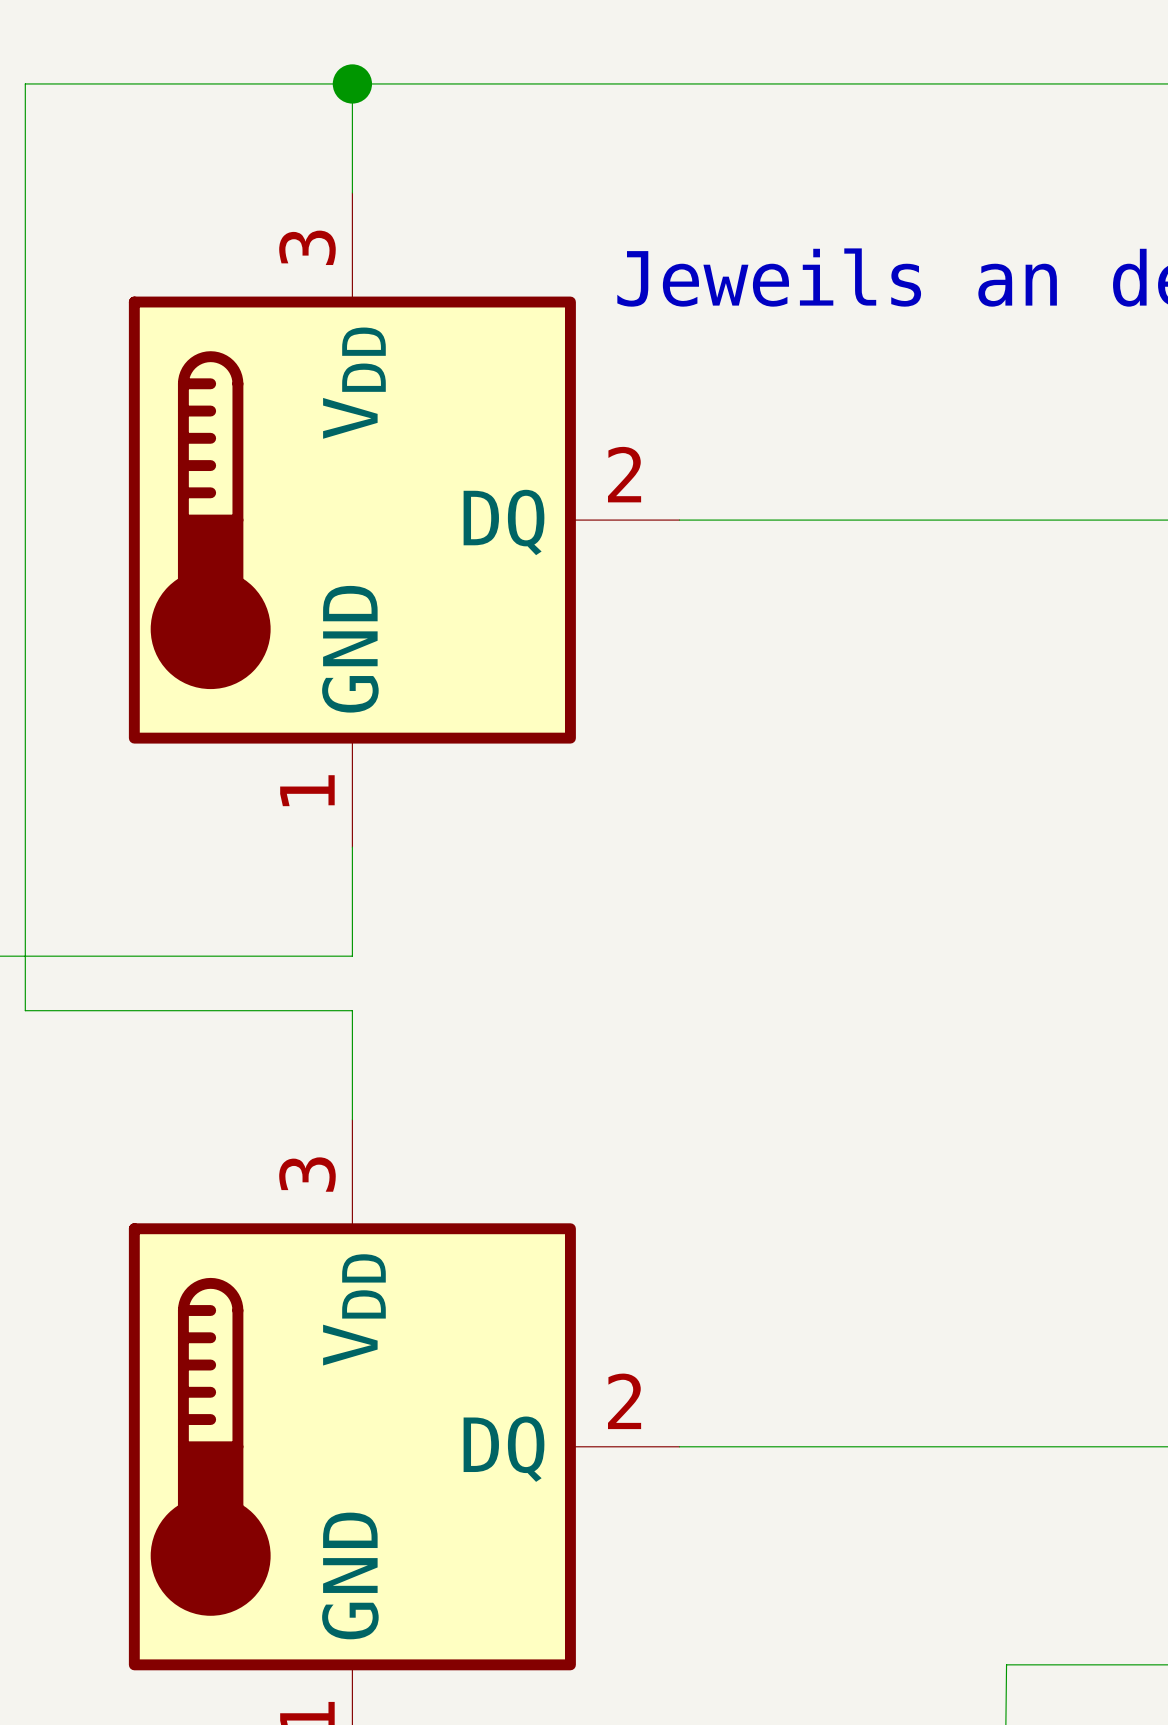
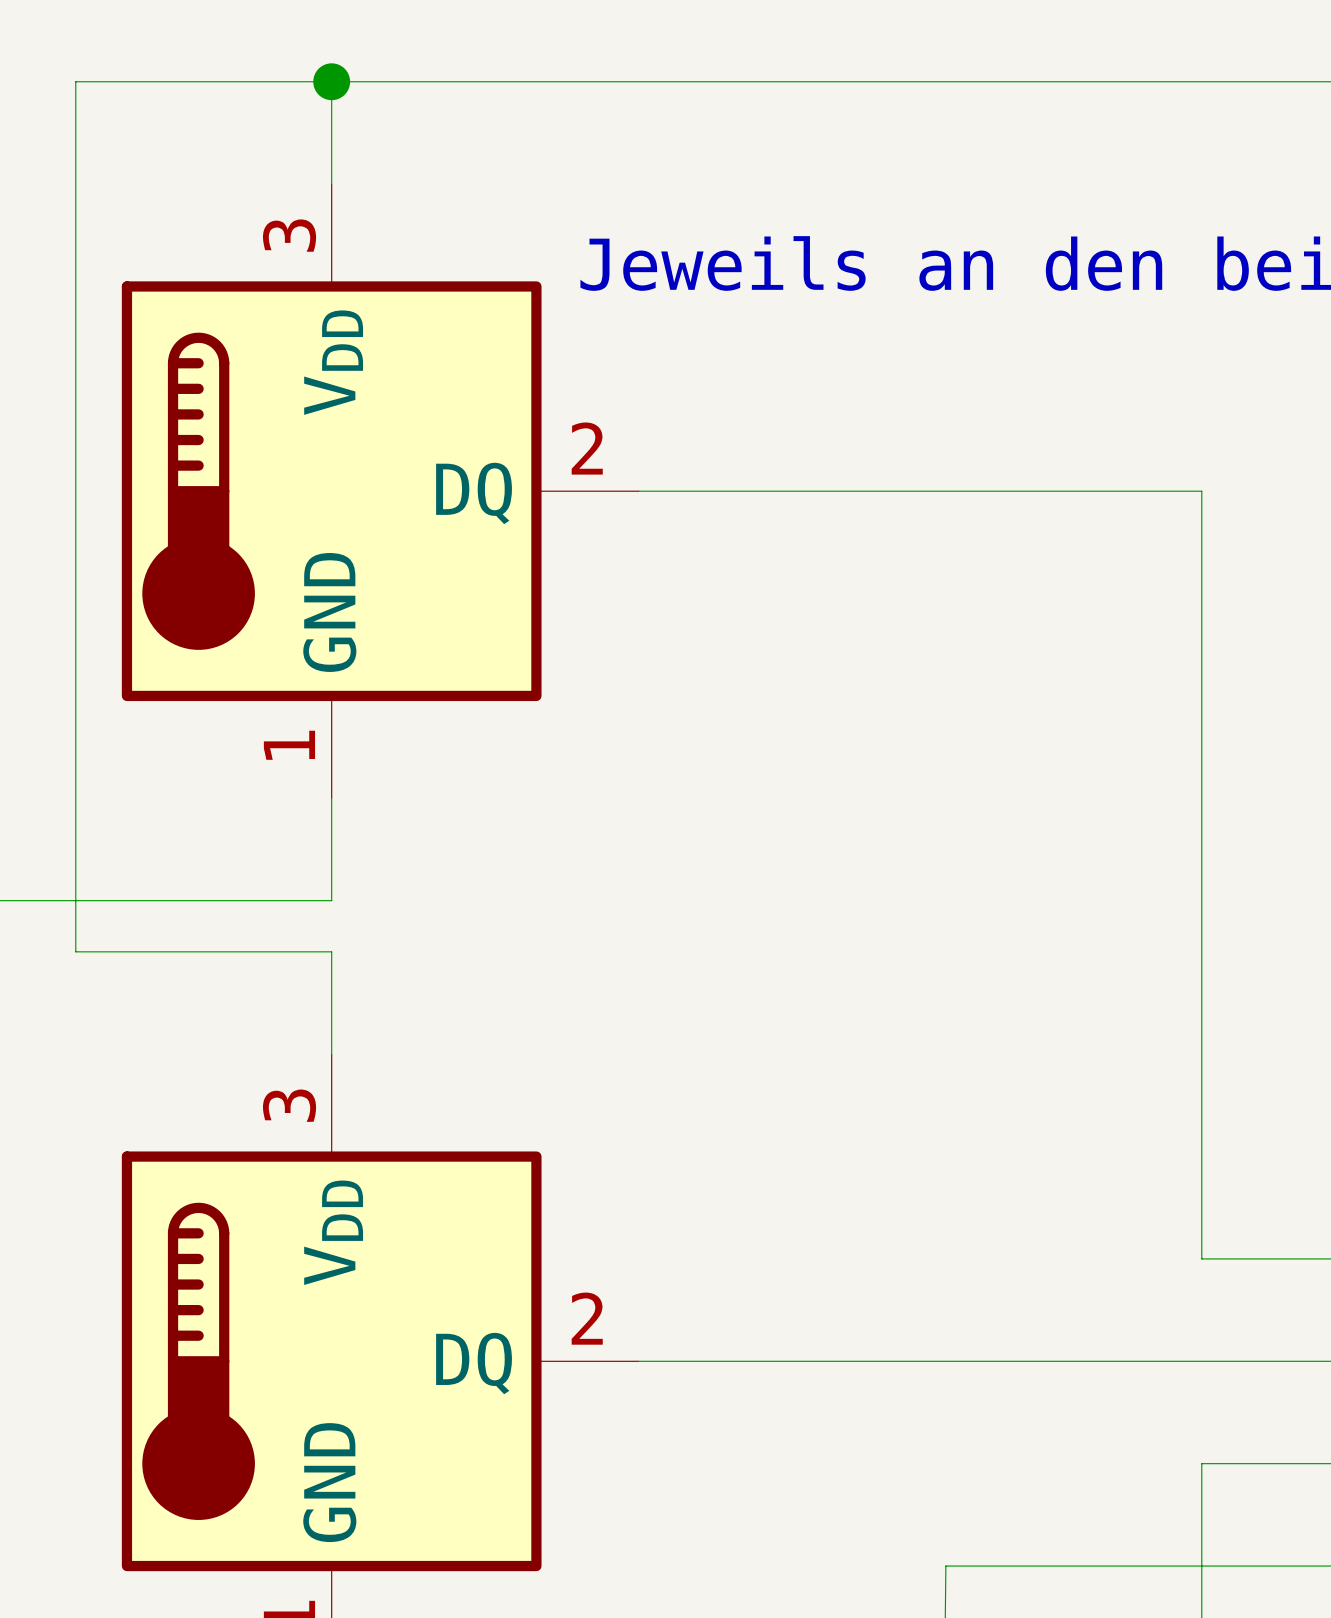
wire: (79, 83) (25, 83) (25, 1010) (79, 1010) -> (75, 81) (75, 951)

